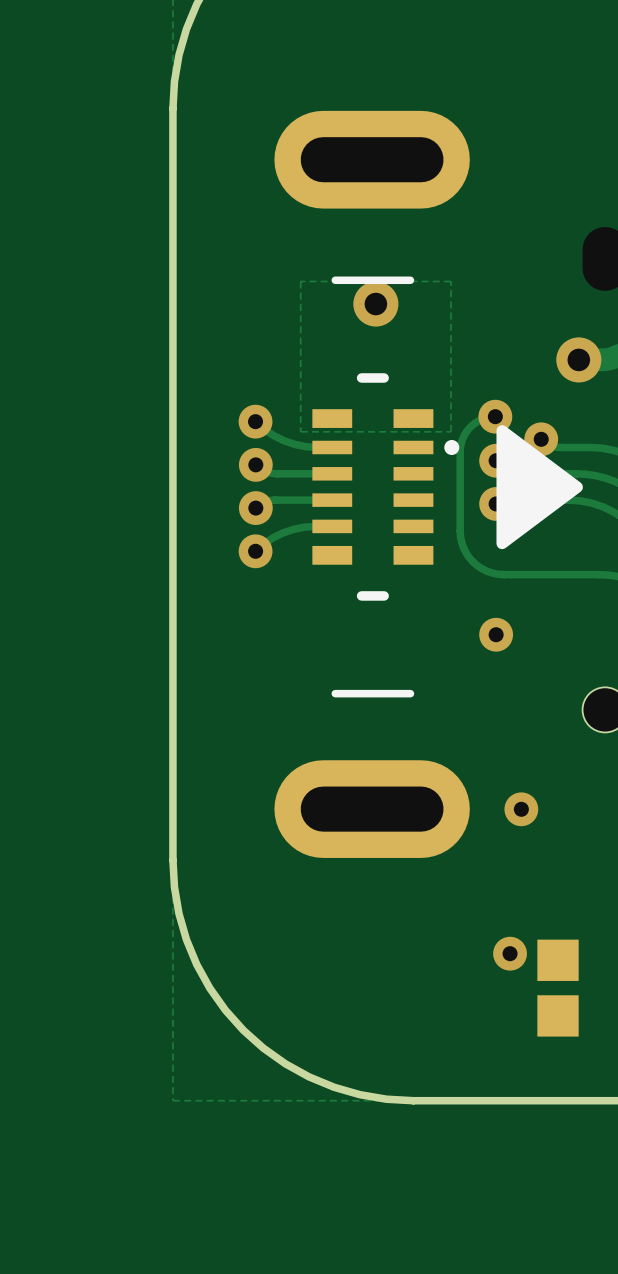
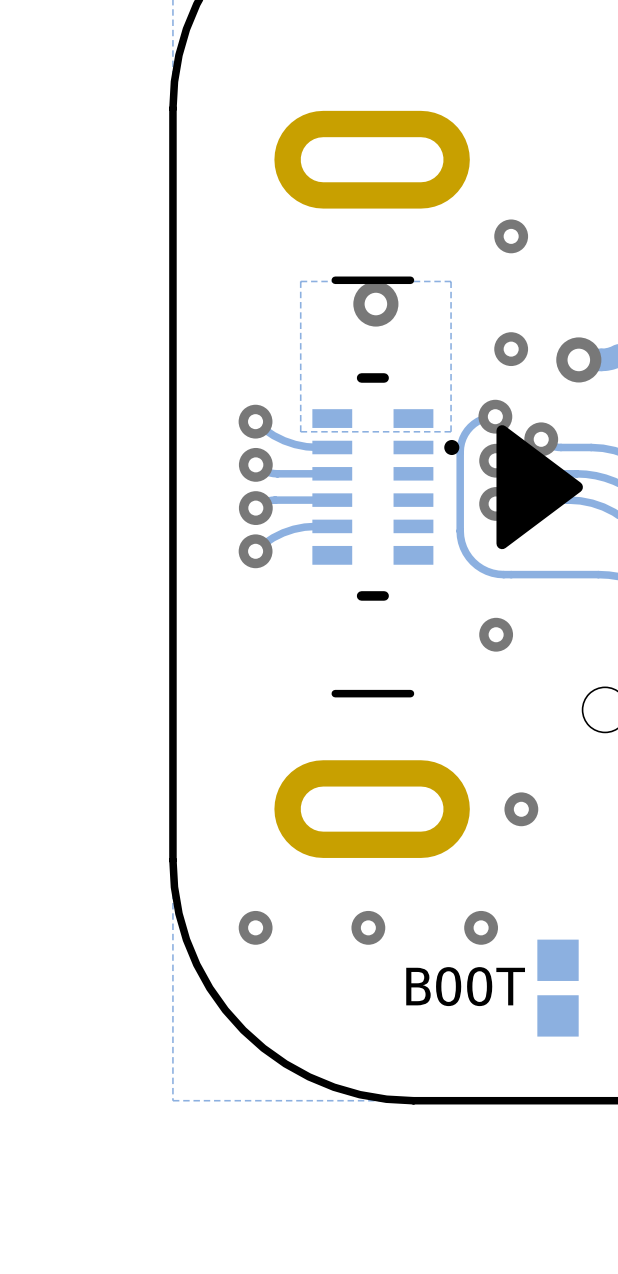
via: none -> (511, 236)
via: none -> (511, 349)
via: none -> (255, 927)
via: none -> (368, 927)
via position: (510, 953) -> (481, 927)
text: none -> BOOT (465, 986)

